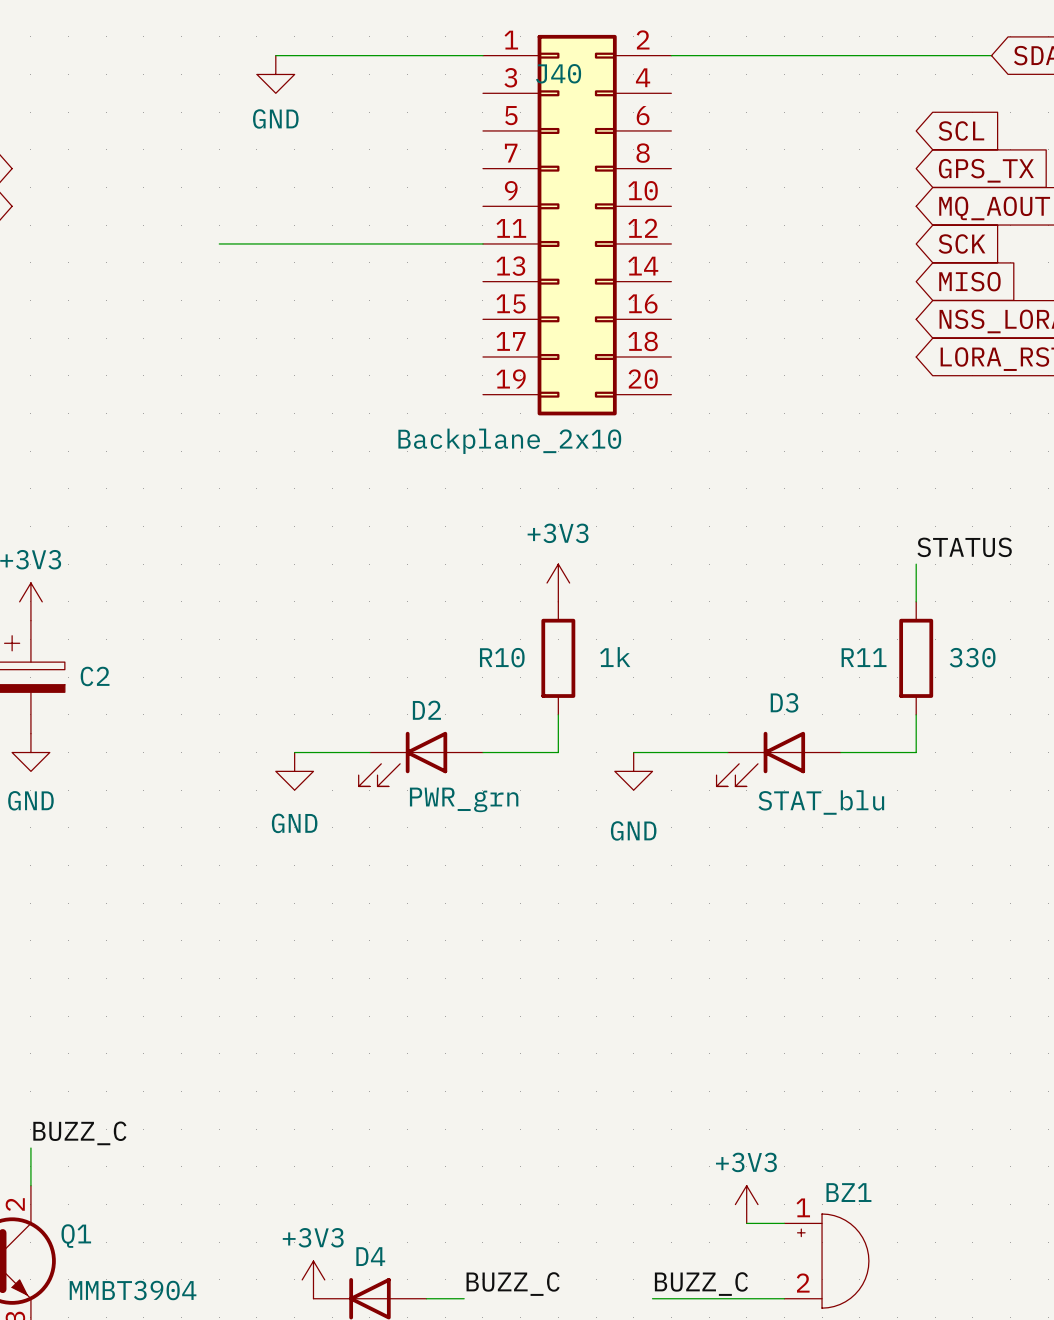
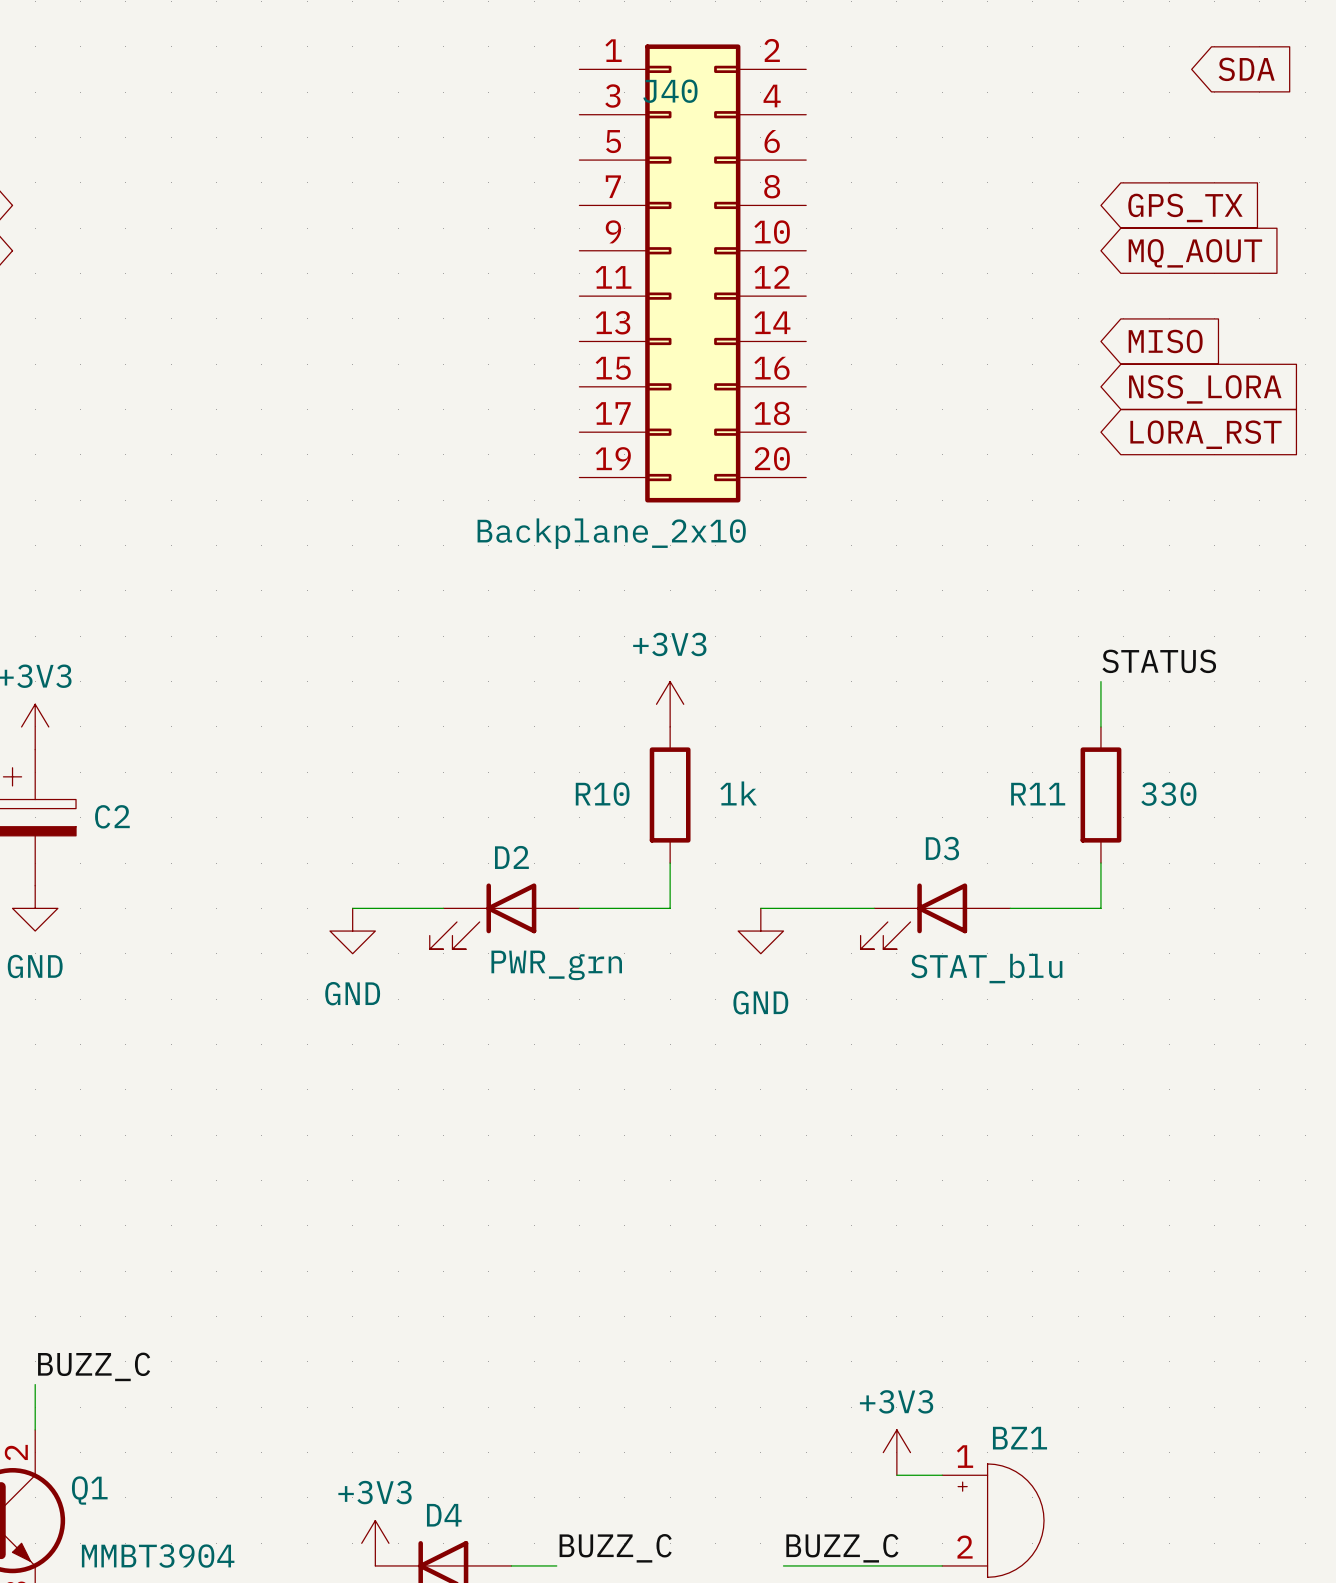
wire: (275, 55) (482, 55) -> none
wire: (671, 55) (991, 55) -> none
power symbol: GND (275, 74) -> none
global label: SCL (961, 130) -> none
wire: (219, 243) (482, 243) -> none
global label: SCK (961, 243) -> none

